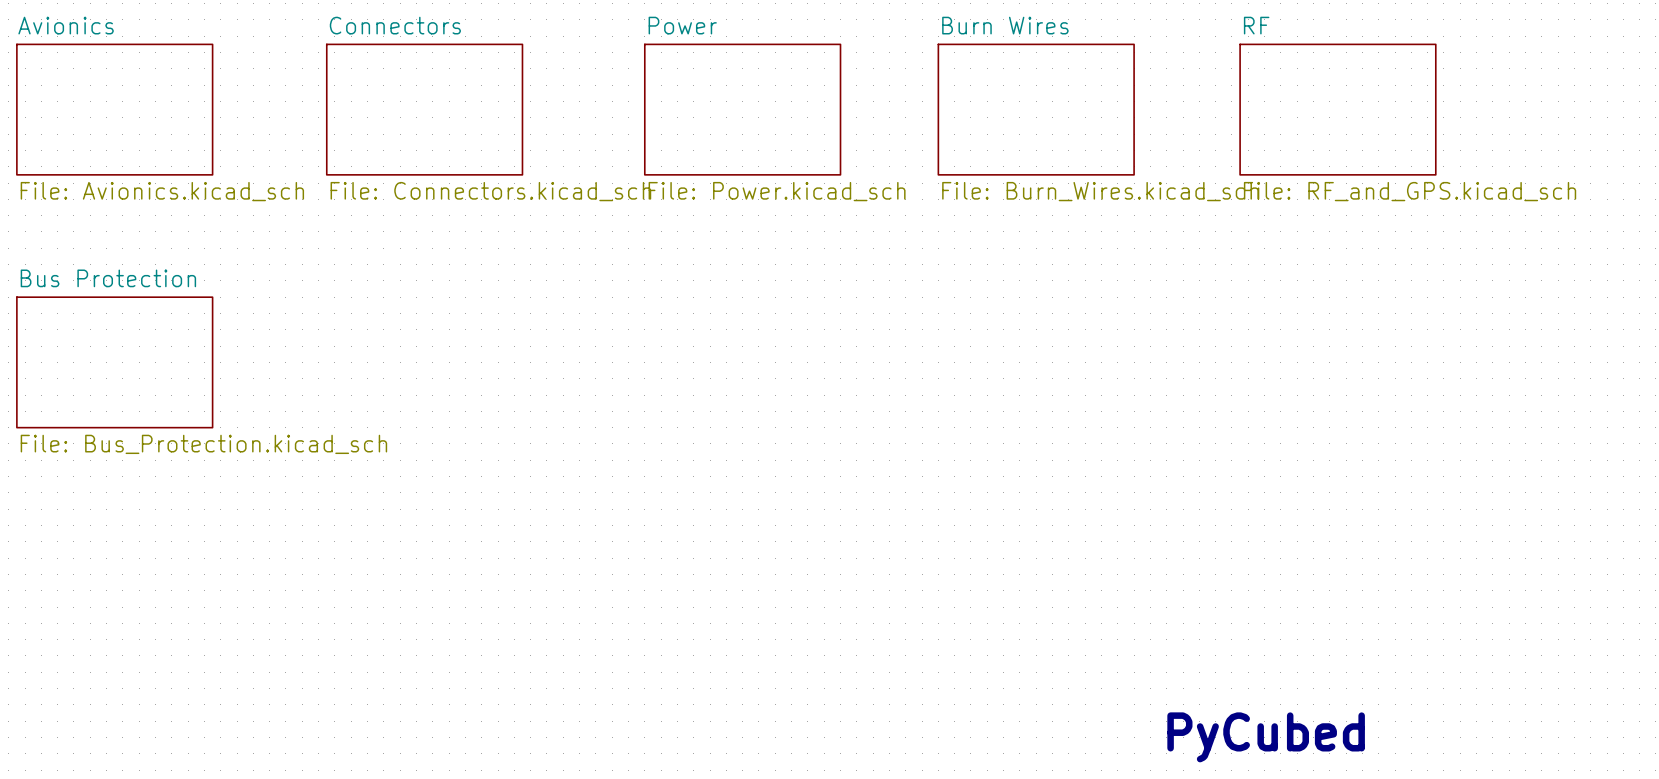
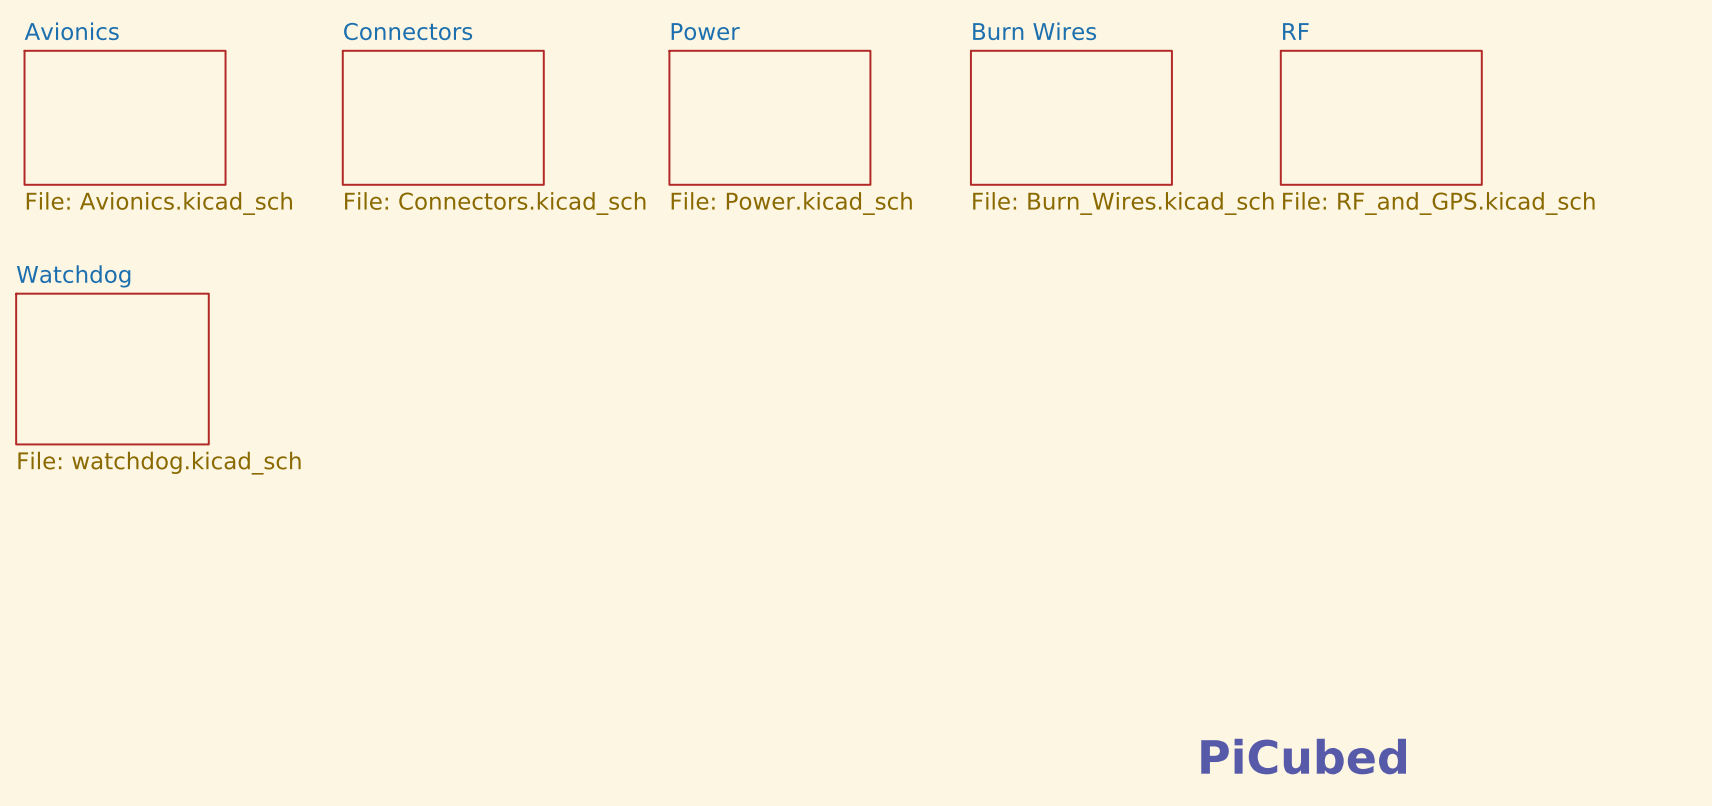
sheet Watchdog: none -> File: watchdog.kicad_sch (112, 369)
sheet Bus Protection: File: Bus_Protection.kicad_sch (114, 362) -> none
text: PyCubed (1266, 737) -> PiCubed (1303, 756)

